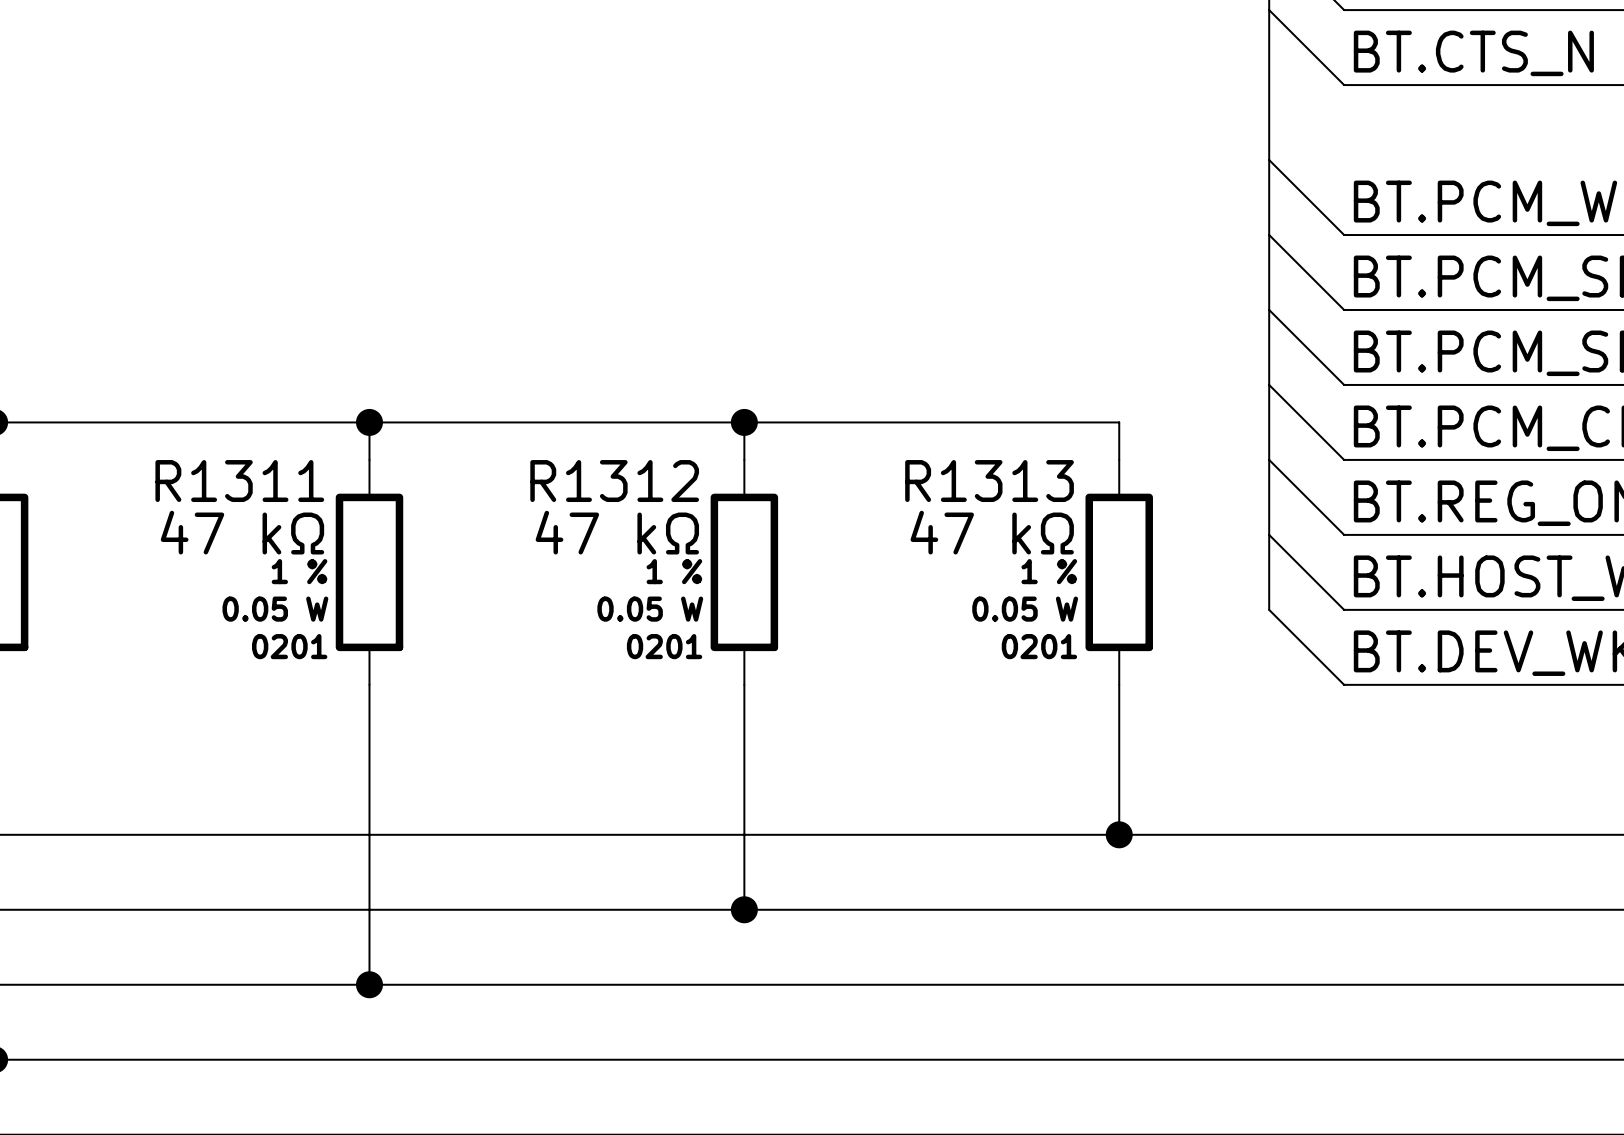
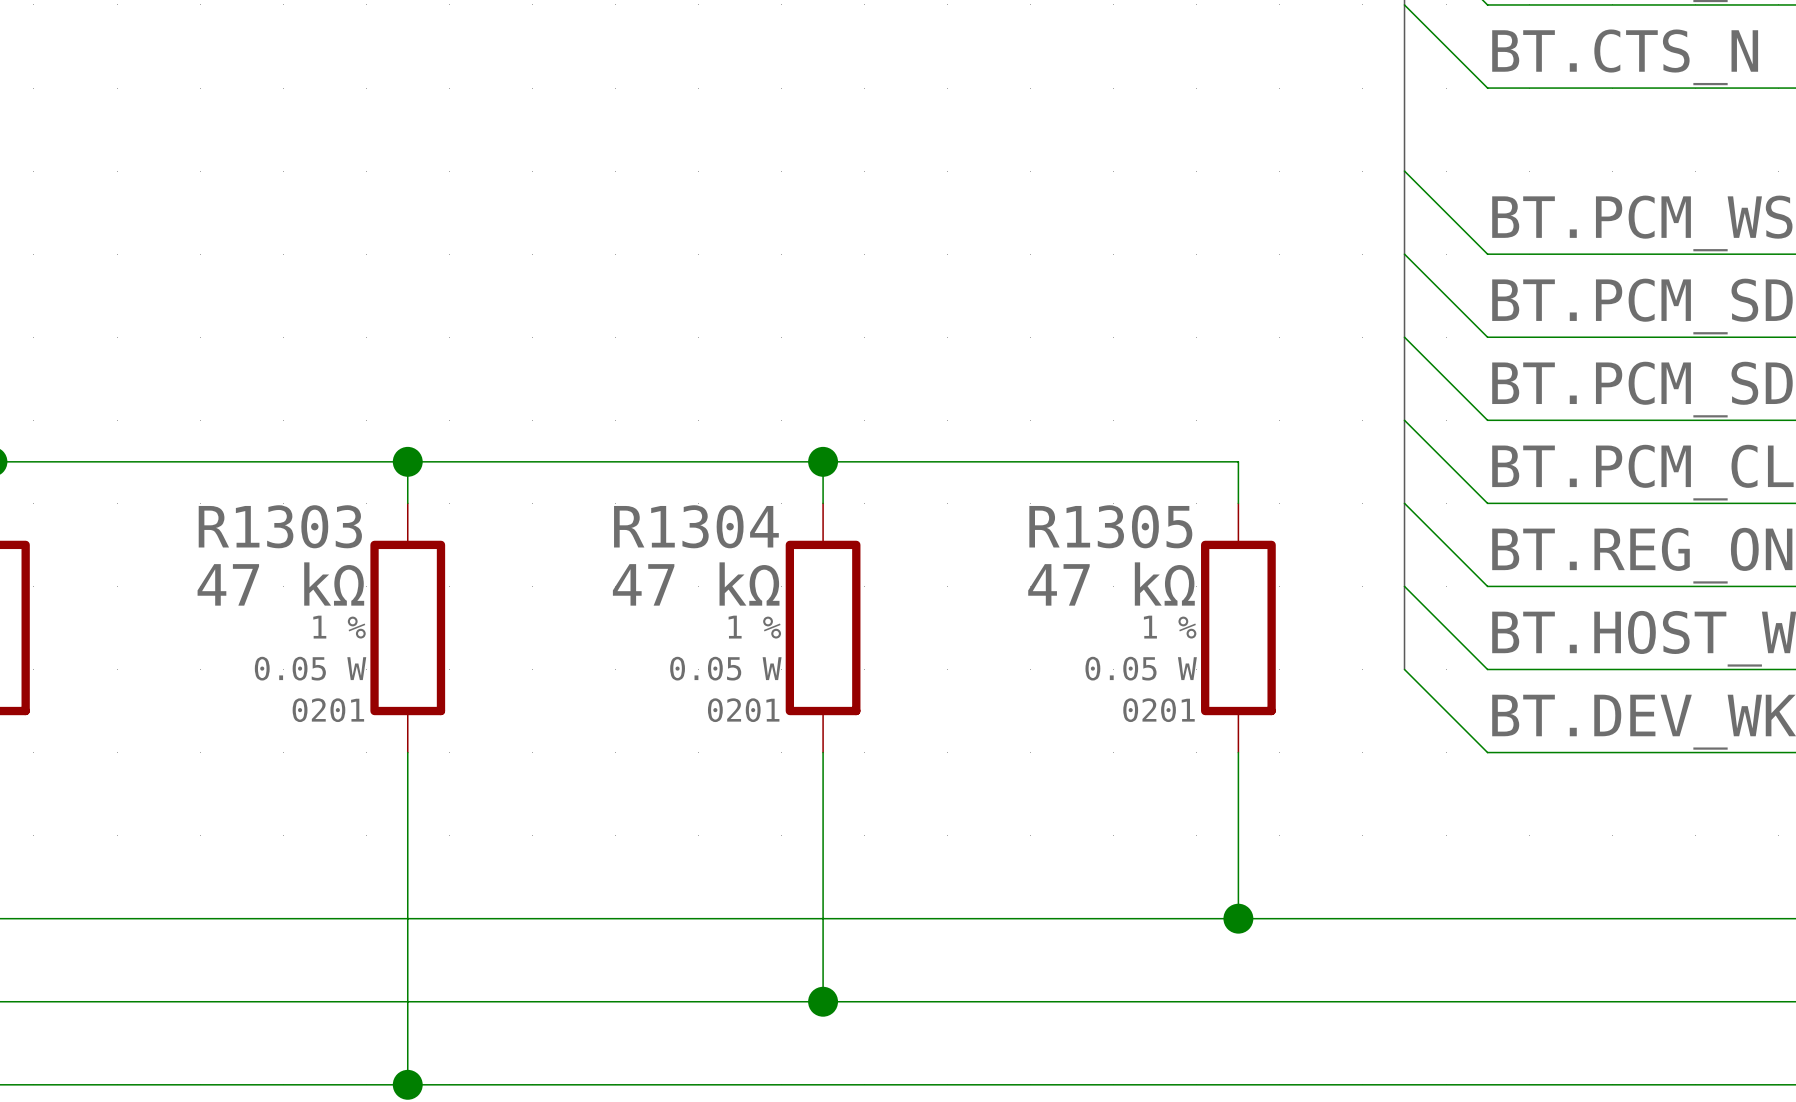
R1311 name: R1311 (239, 481) -> R1303 (280, 526)
R1312 name: R1312 (614, 481) -> R1304 (696, 526)
R1313 name: R1313 (989, 481) -> R1305 (1110, 526)

